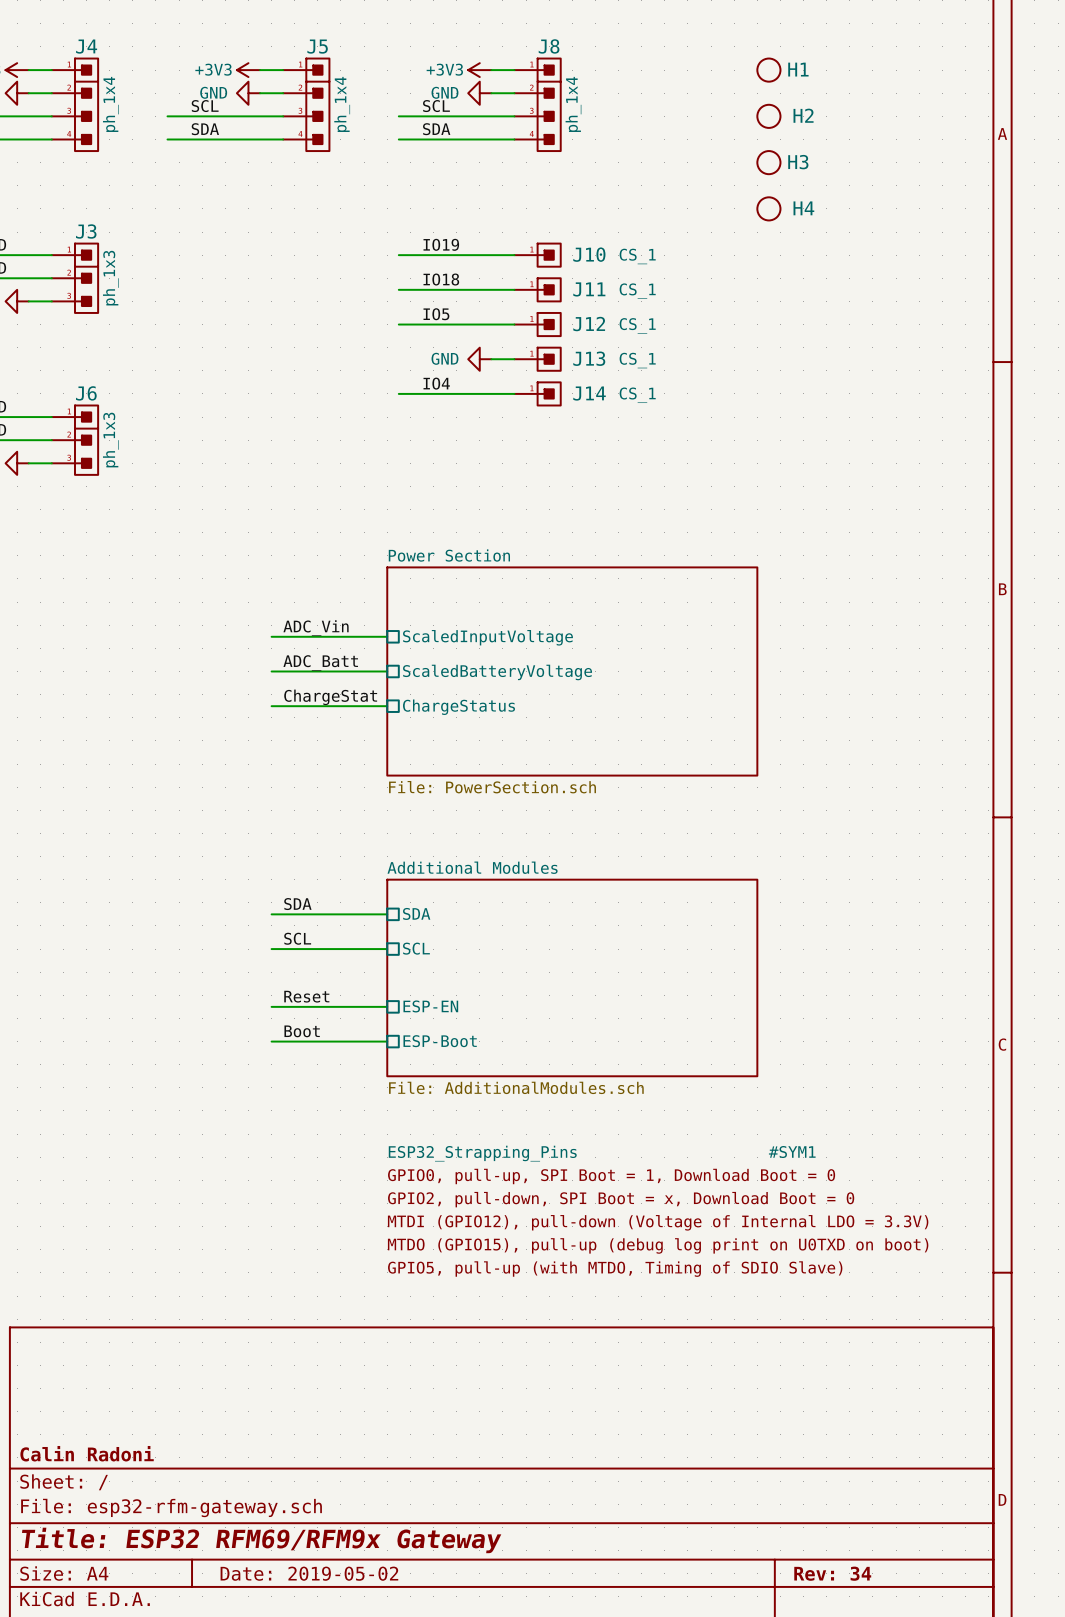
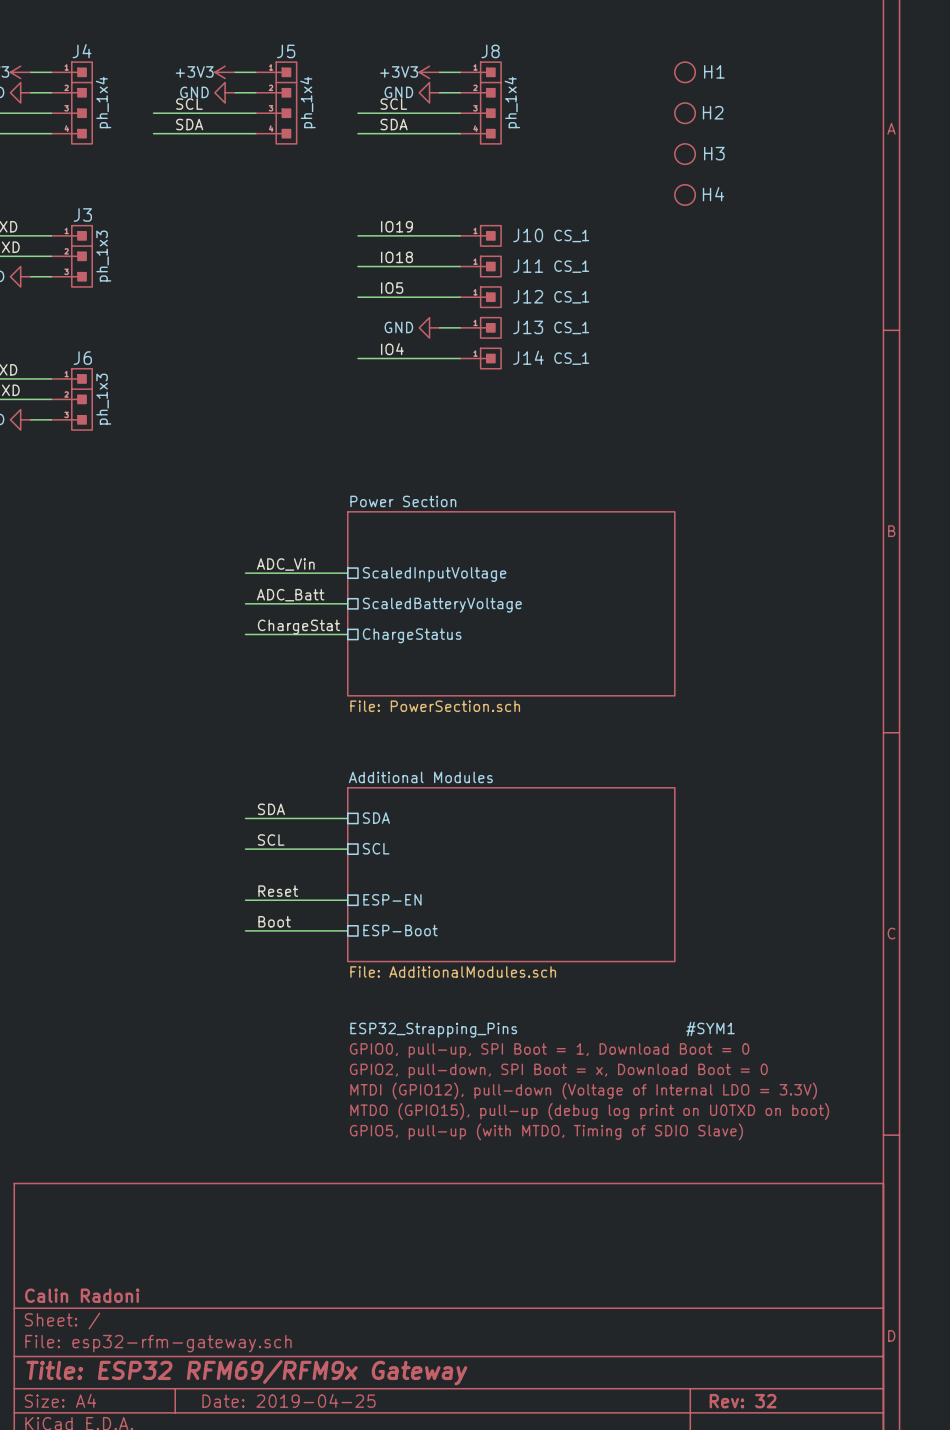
title block: Date: 2019-05-02 (309, 1573) -> Date: 2019-04-25 (288, 1400)
title block: Rev: 34 (832, 1573) -> Rev: 32 (743, 1401)

